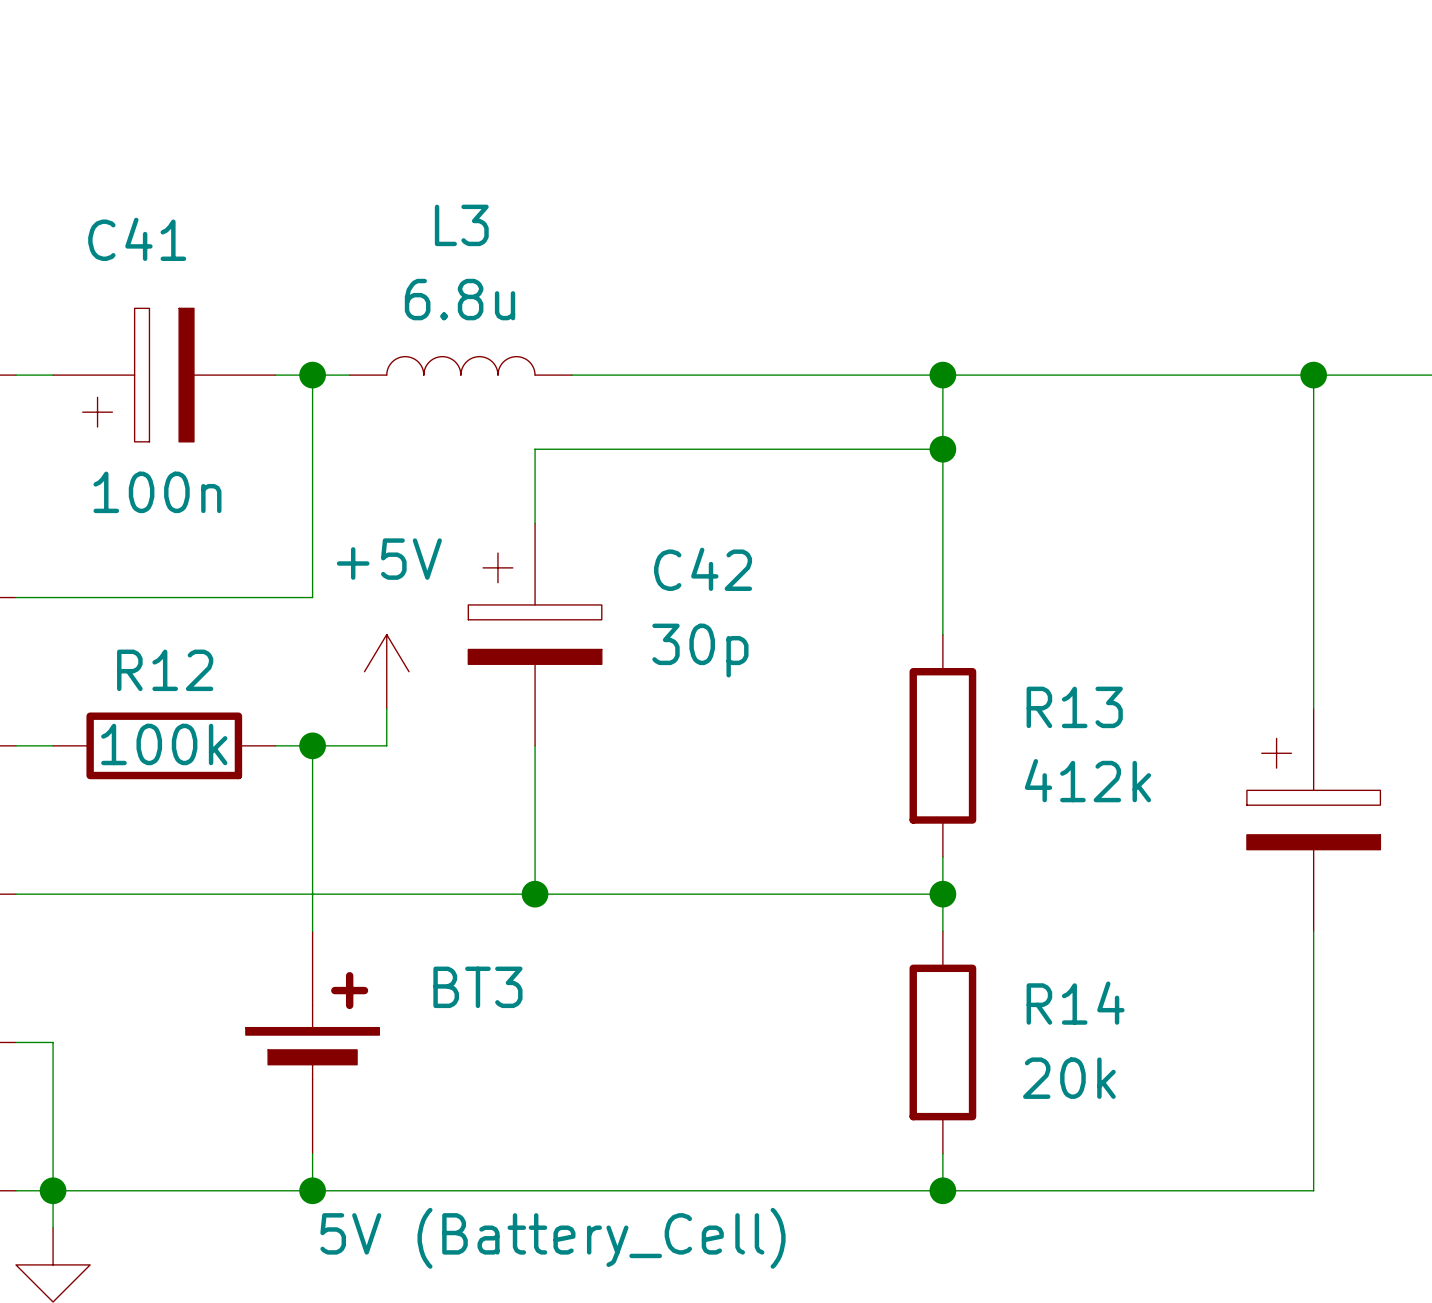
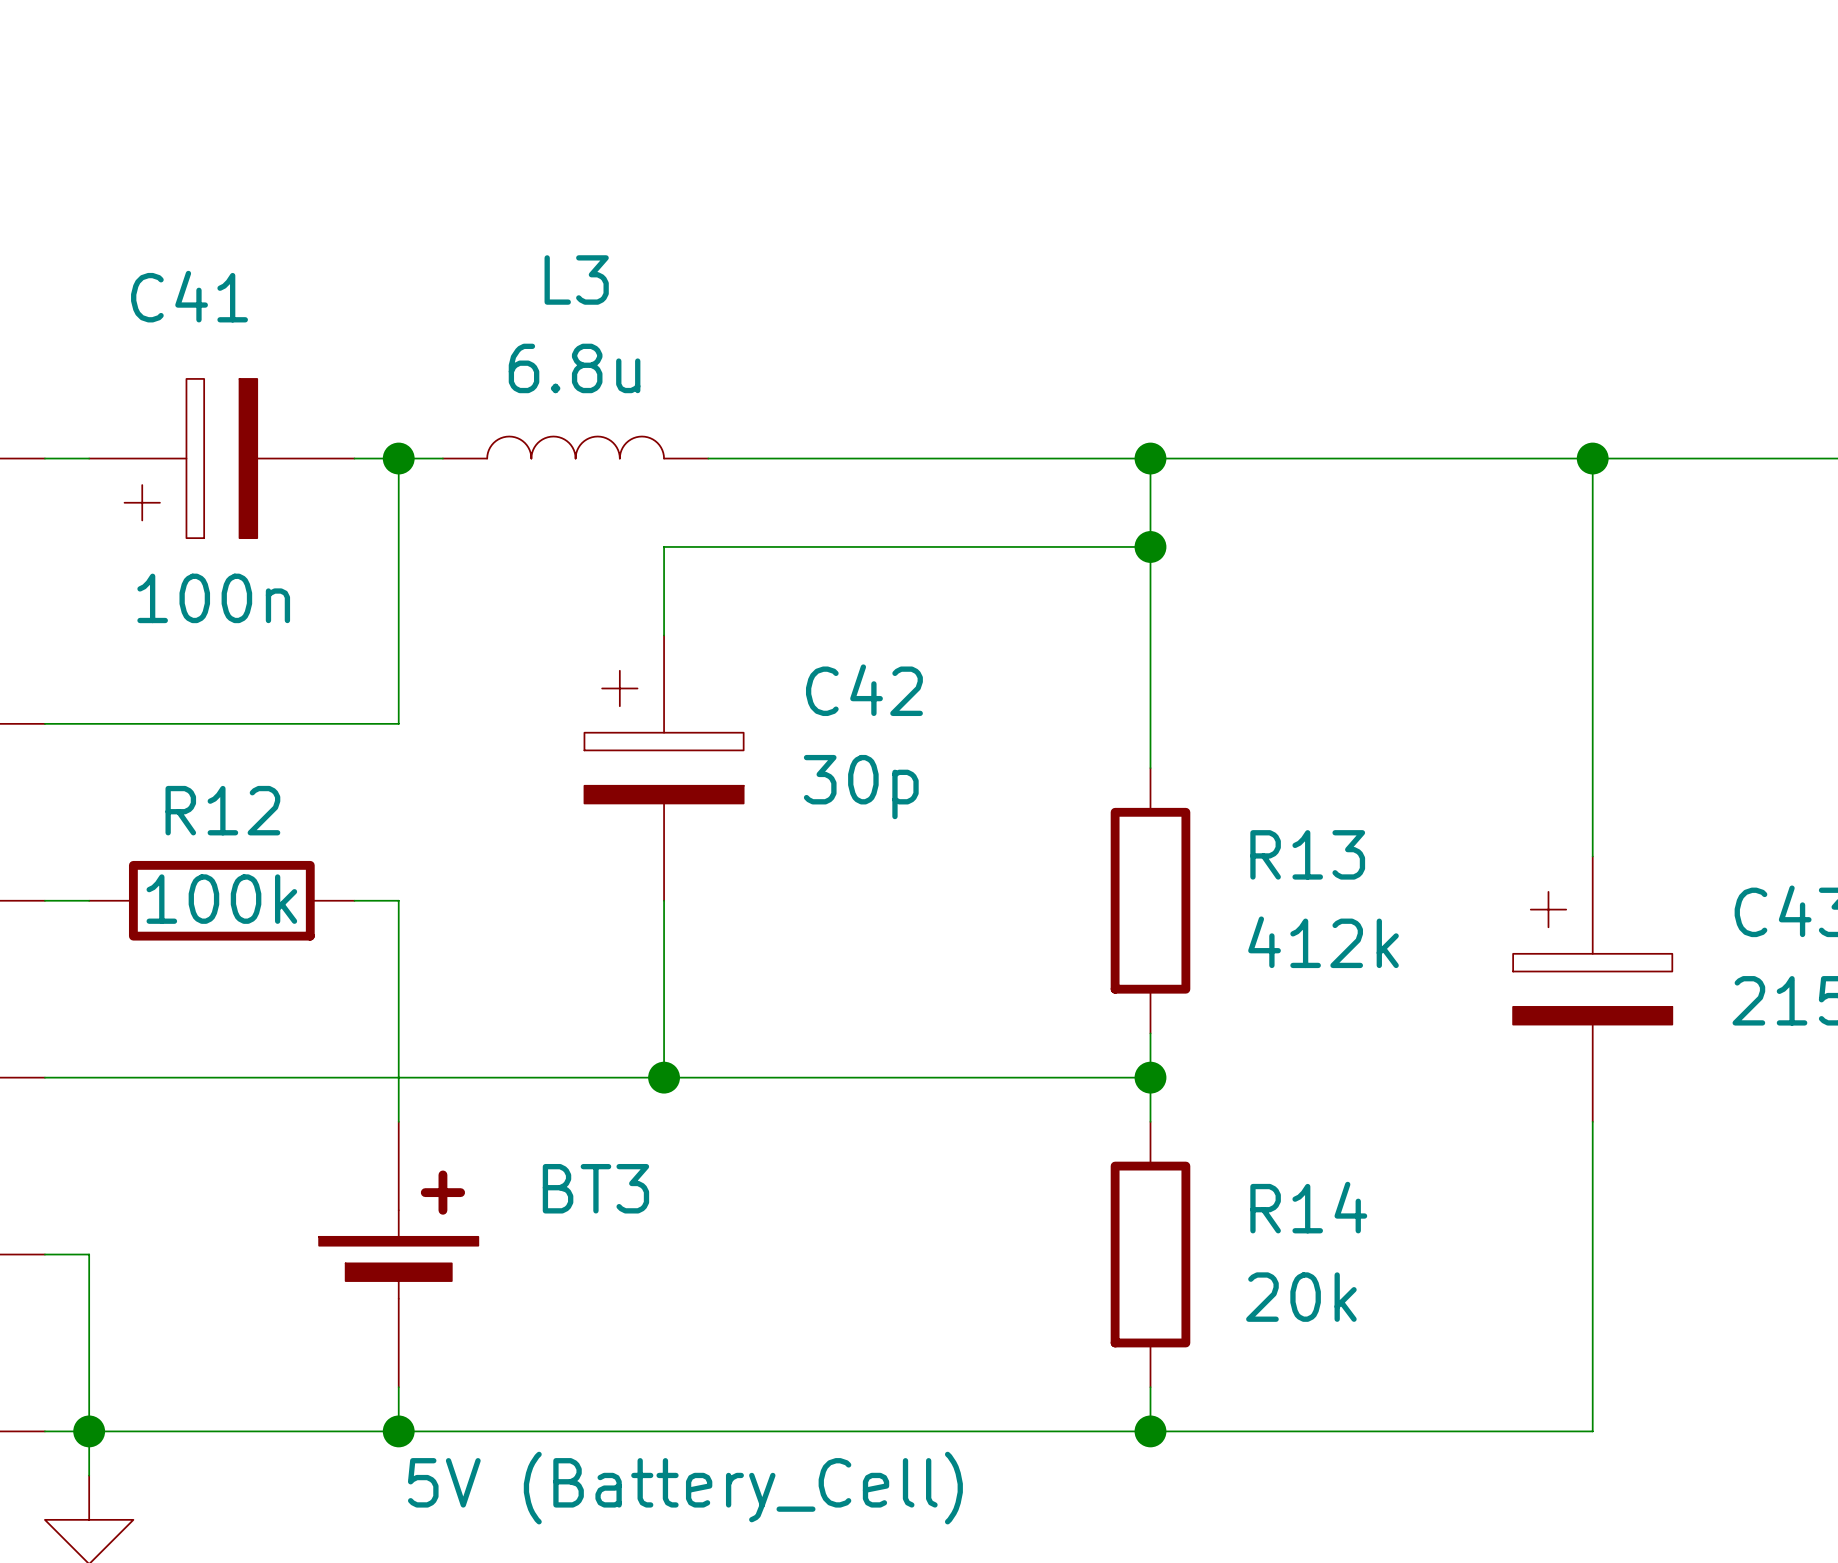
power symbol: +5V (386, 671) -> none
wire: (386, 708) (386, 745) (312, 745) -> none
junction: (312, 745) -> none

